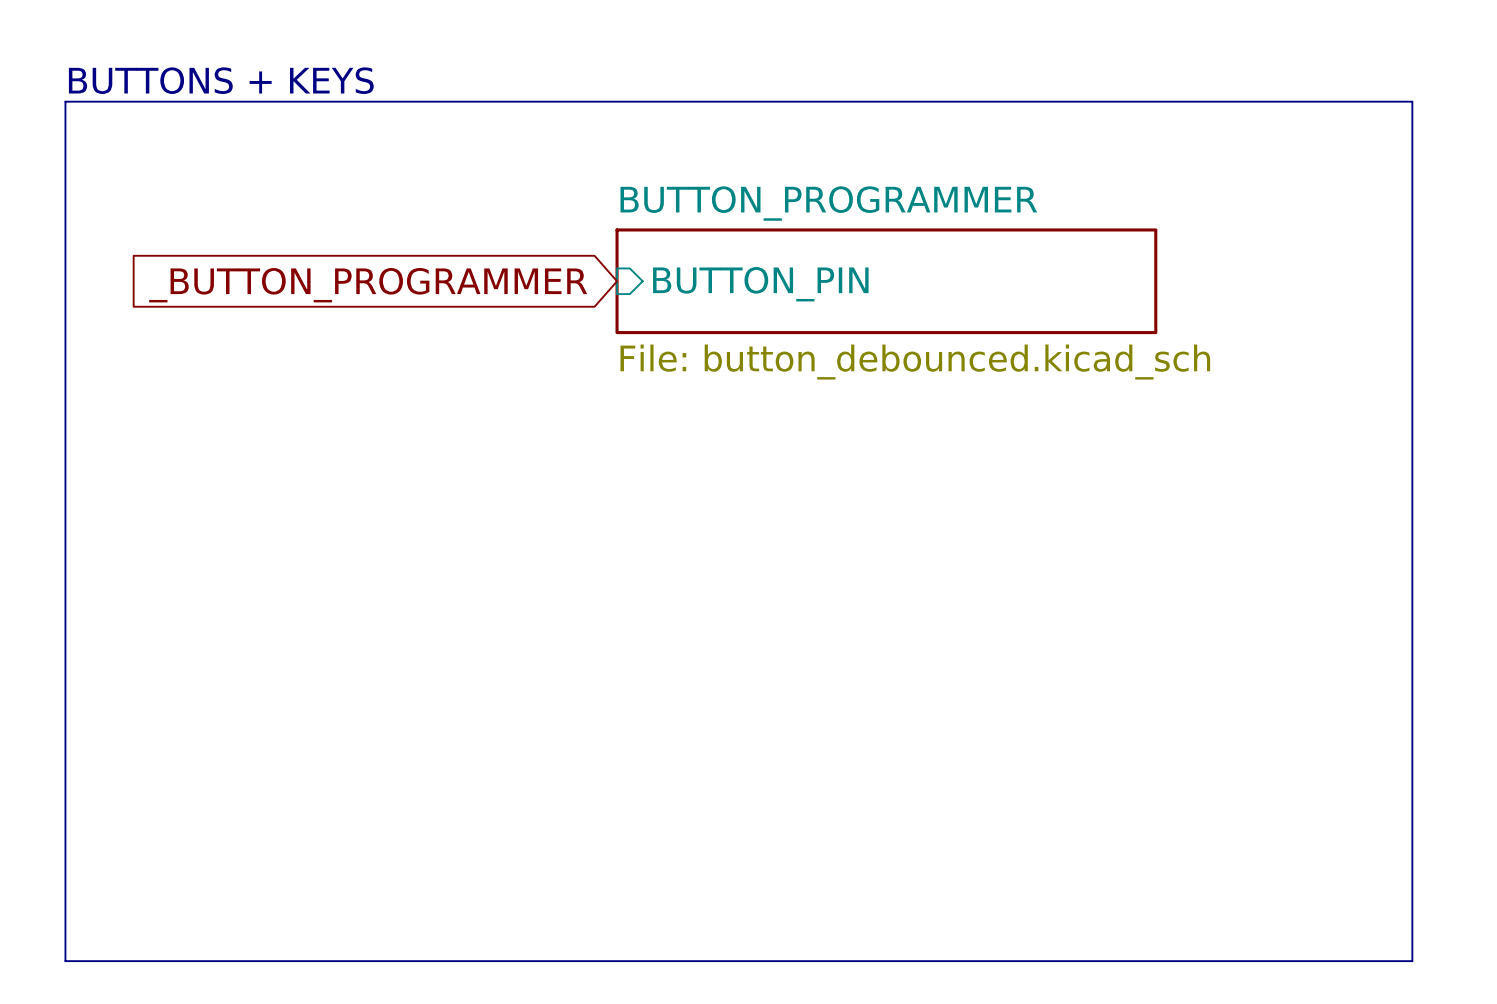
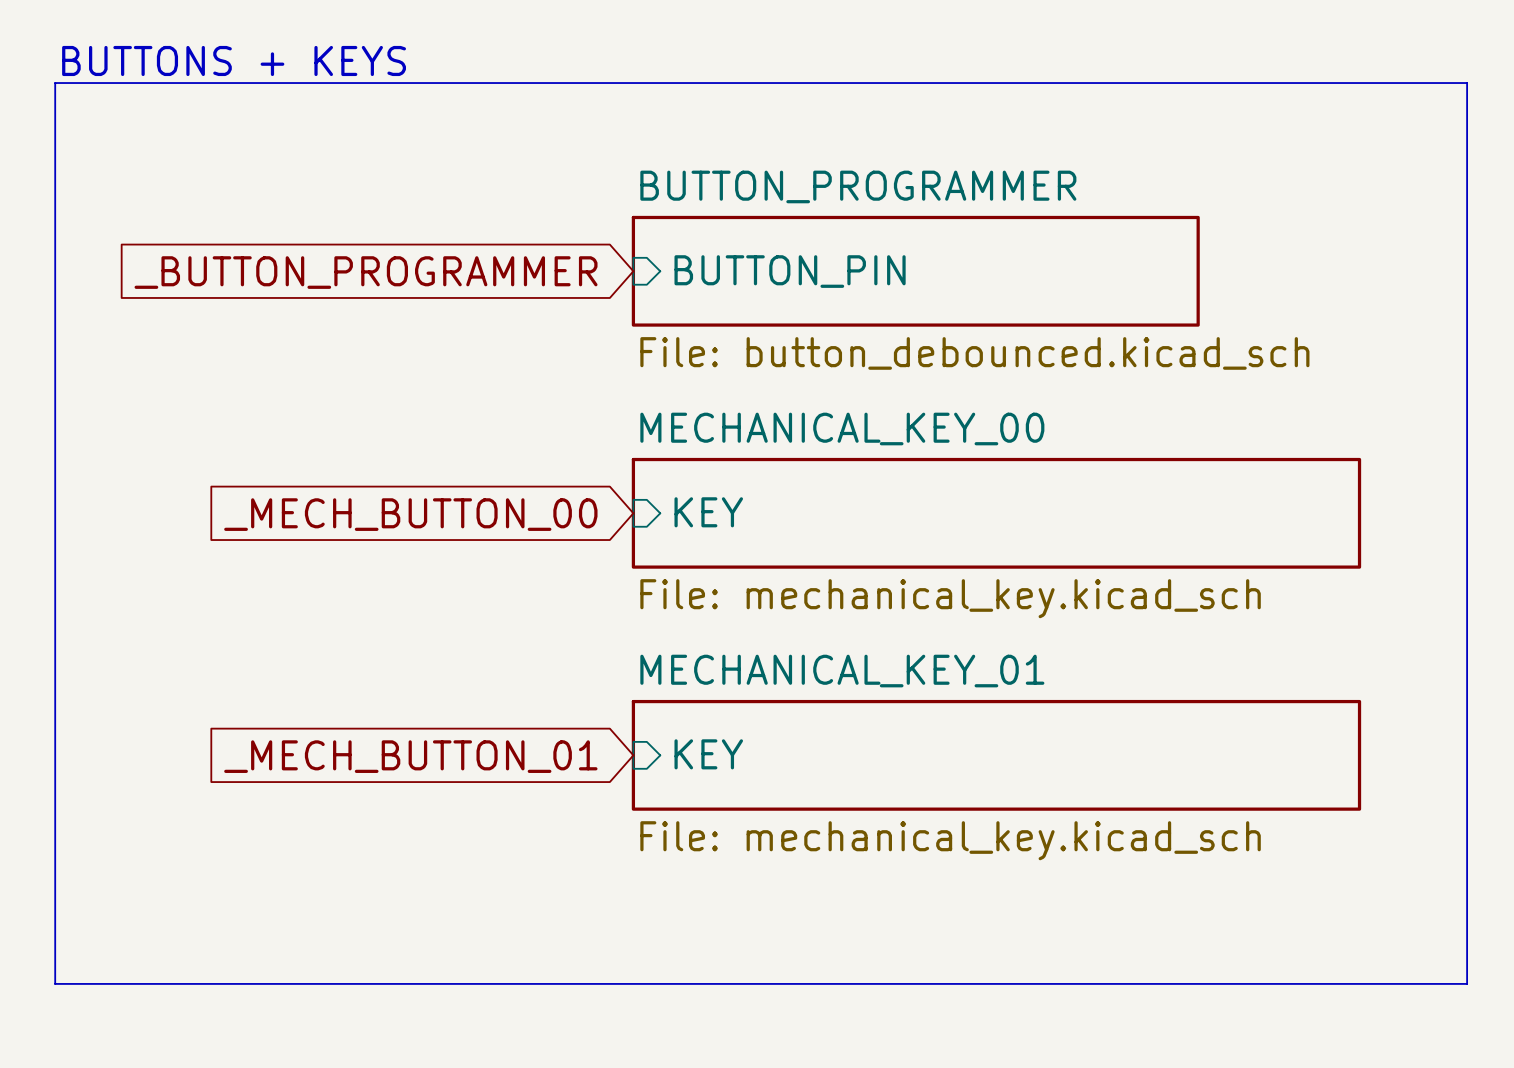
sheet pin: none -> KEY (708, 512)
sheet MECHANICAL_KEY_00: none -> File: mechanical_key.kicad_sch (996, 513)
global label: none -> _MECH_BUTTON_00 (410, 514)
sheet pin: none -> KEY (708, 754)
sheet MECHANICAL_KEY_01: none -> File: mechanical_key.kicad_sch (996, 755)
global label: none -> _MECH_BUTTON_01 (410, 756)

